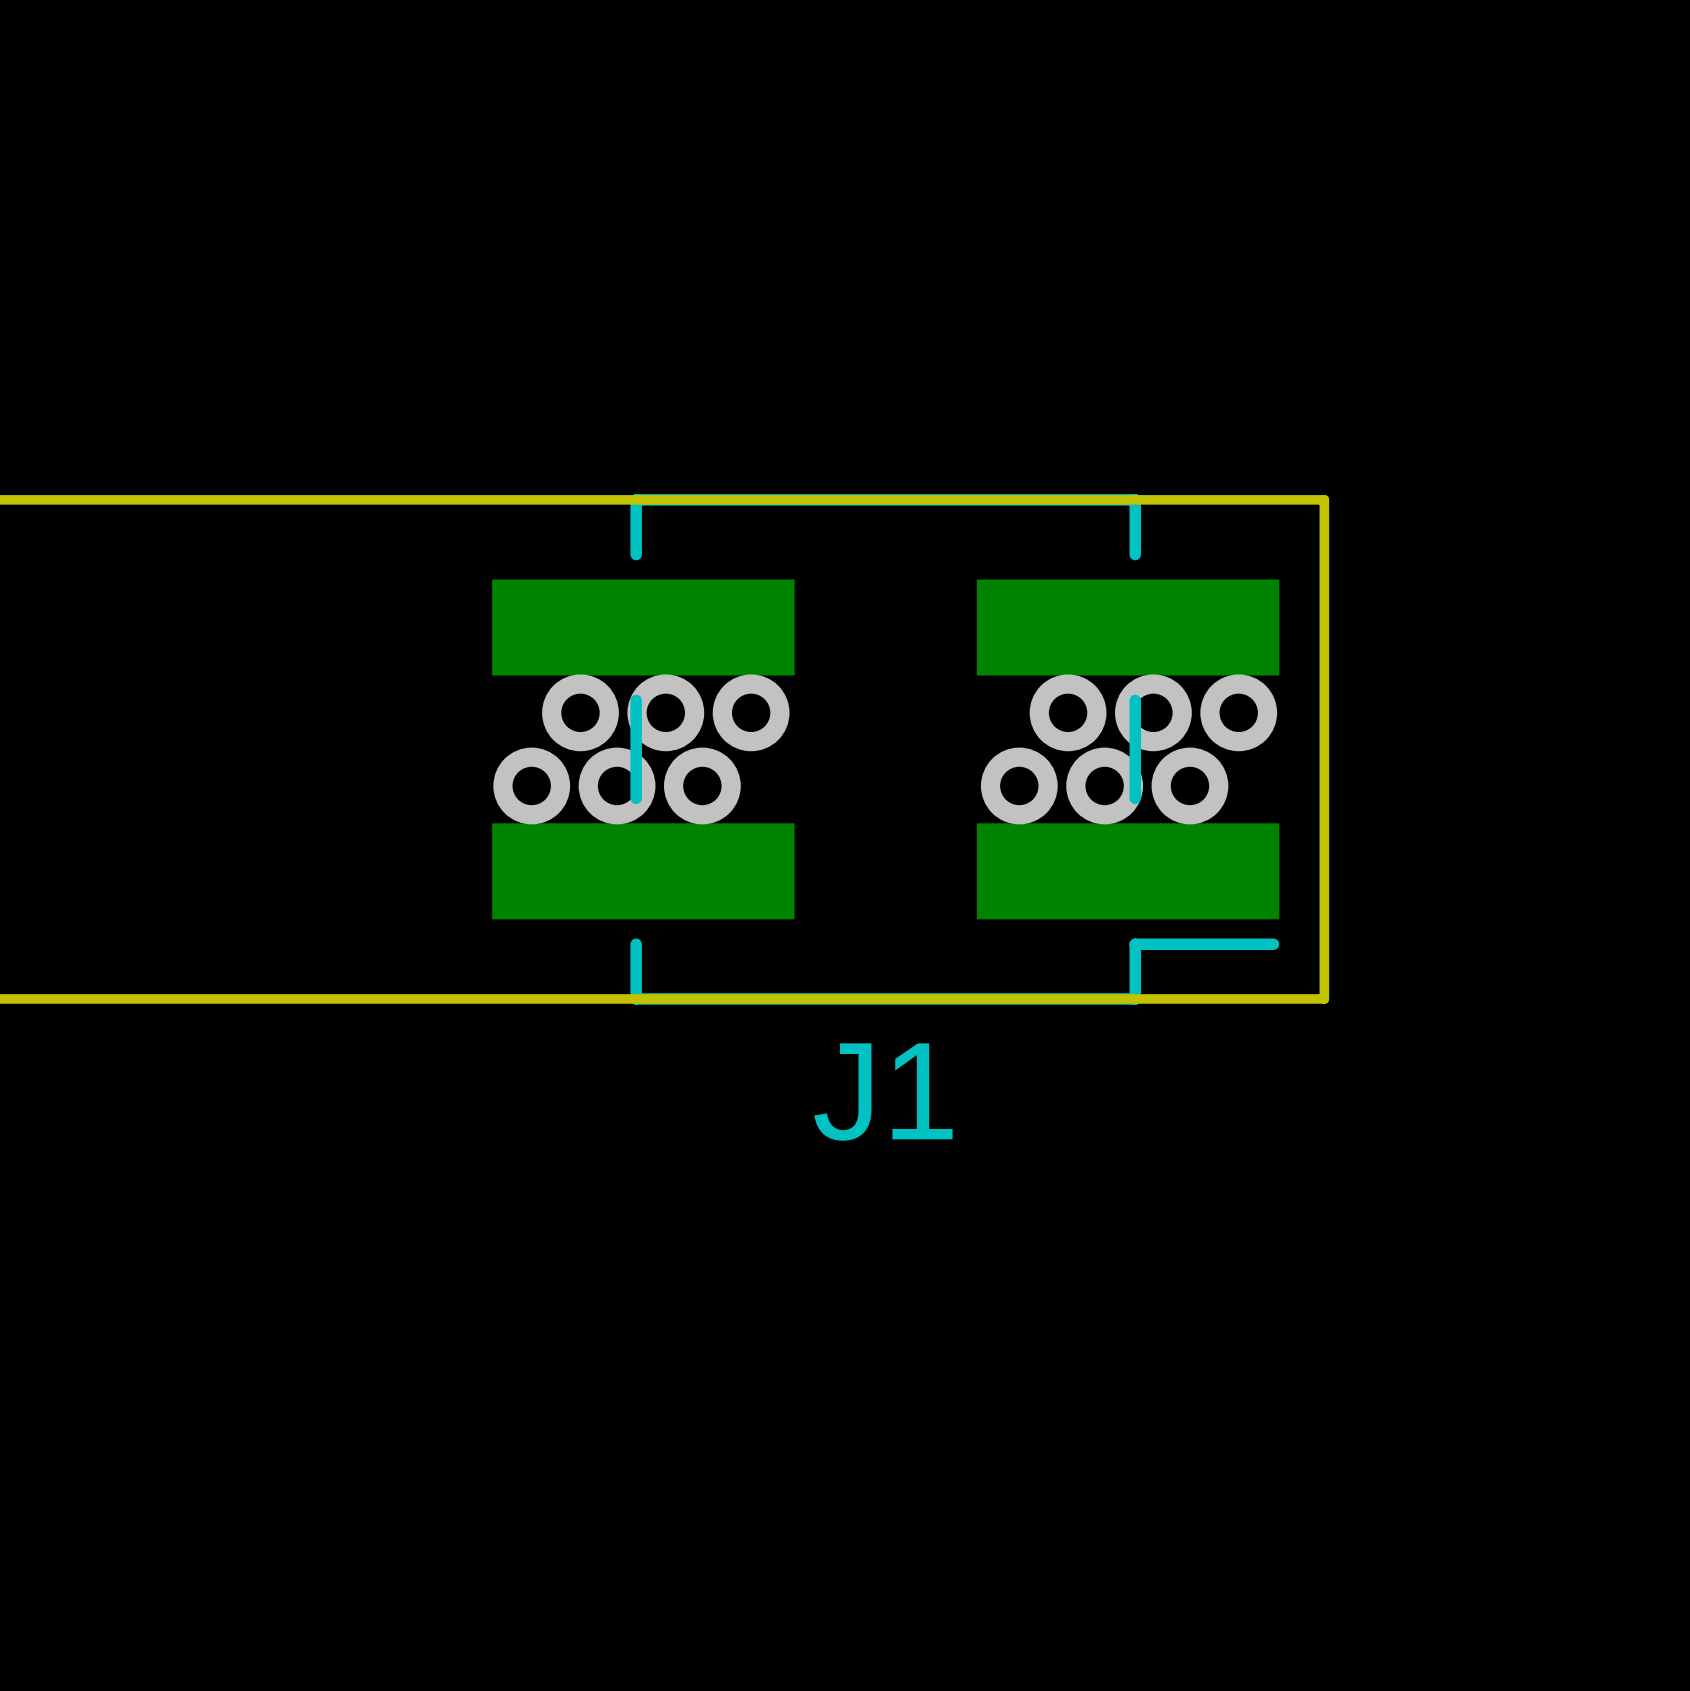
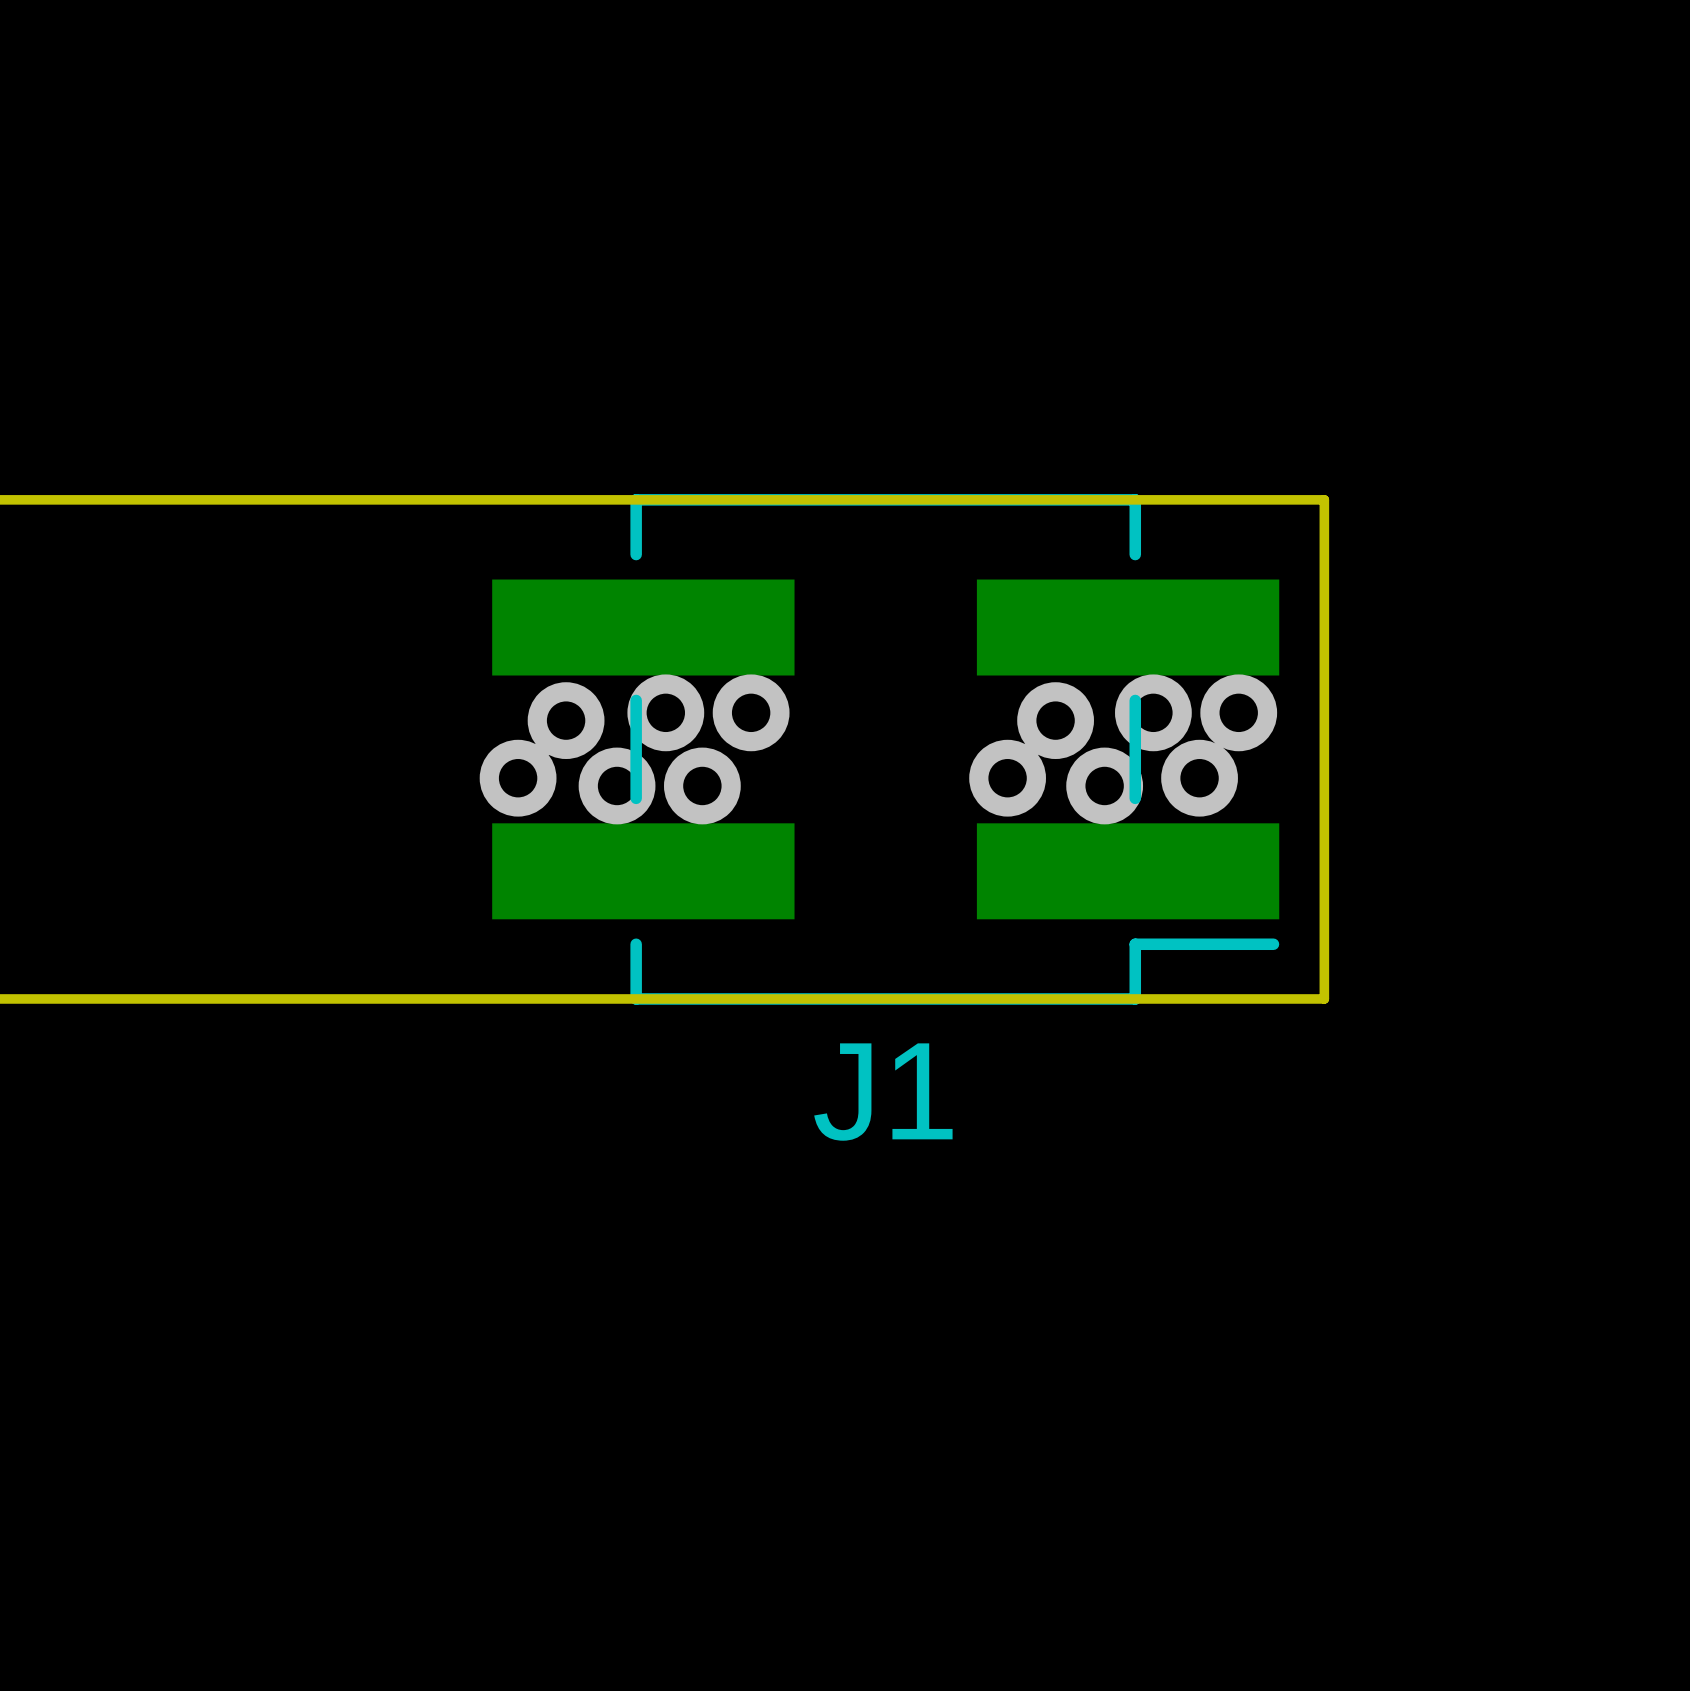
via position: (580, 712) -> (566, 720)
via position: (1068, 712) -> (1055, 720)
via position: (531, 785) -> (518, 778)
via position: (1019, 785) -> (1007, 778)
via position: (1189, 785) -> (1199, 778)

